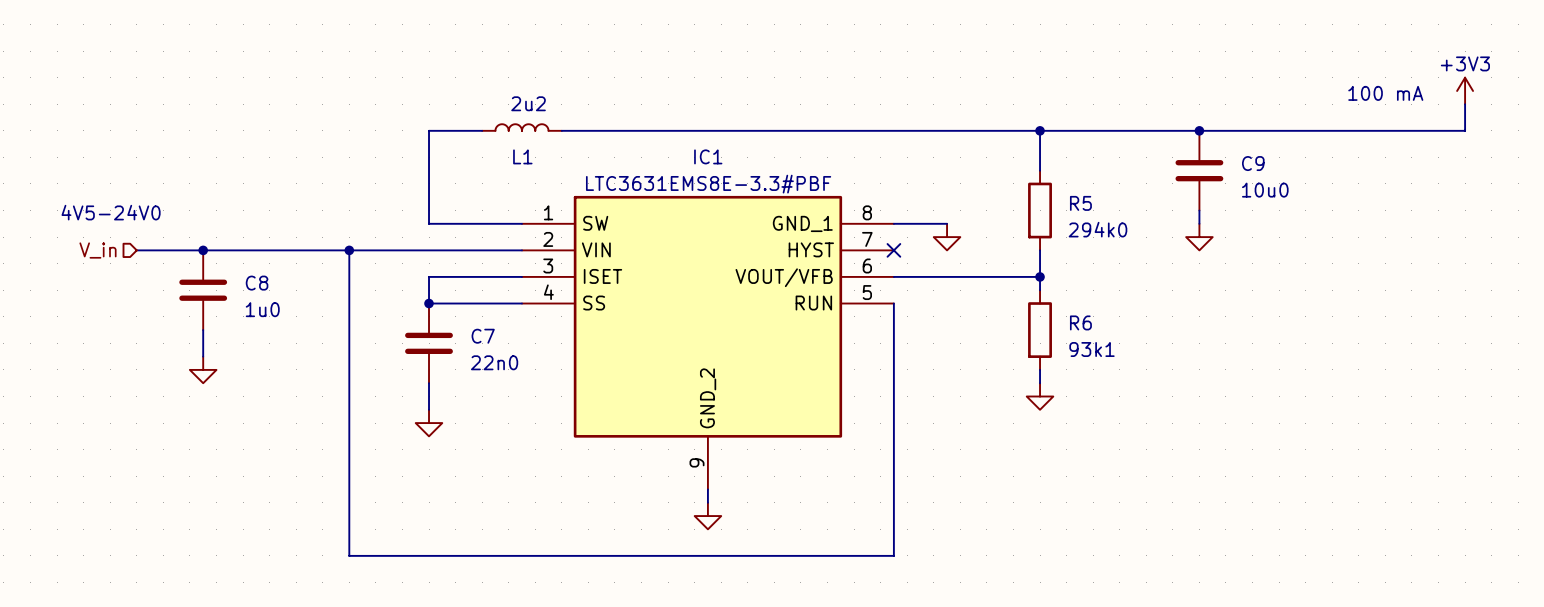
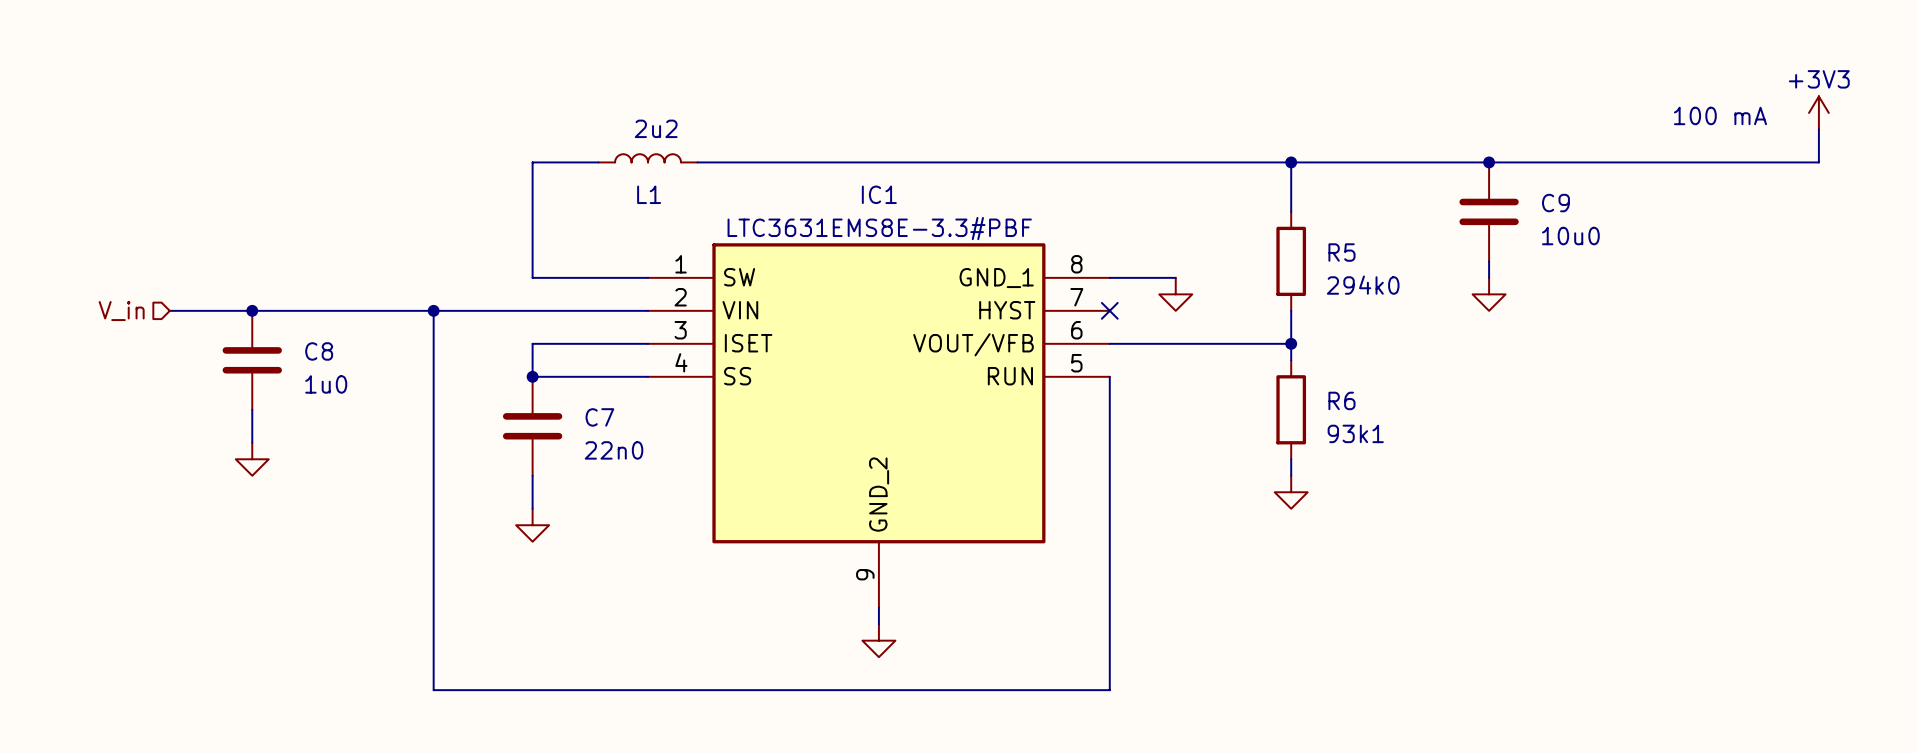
text: 4V5-24V0 (111, 212) -> none

